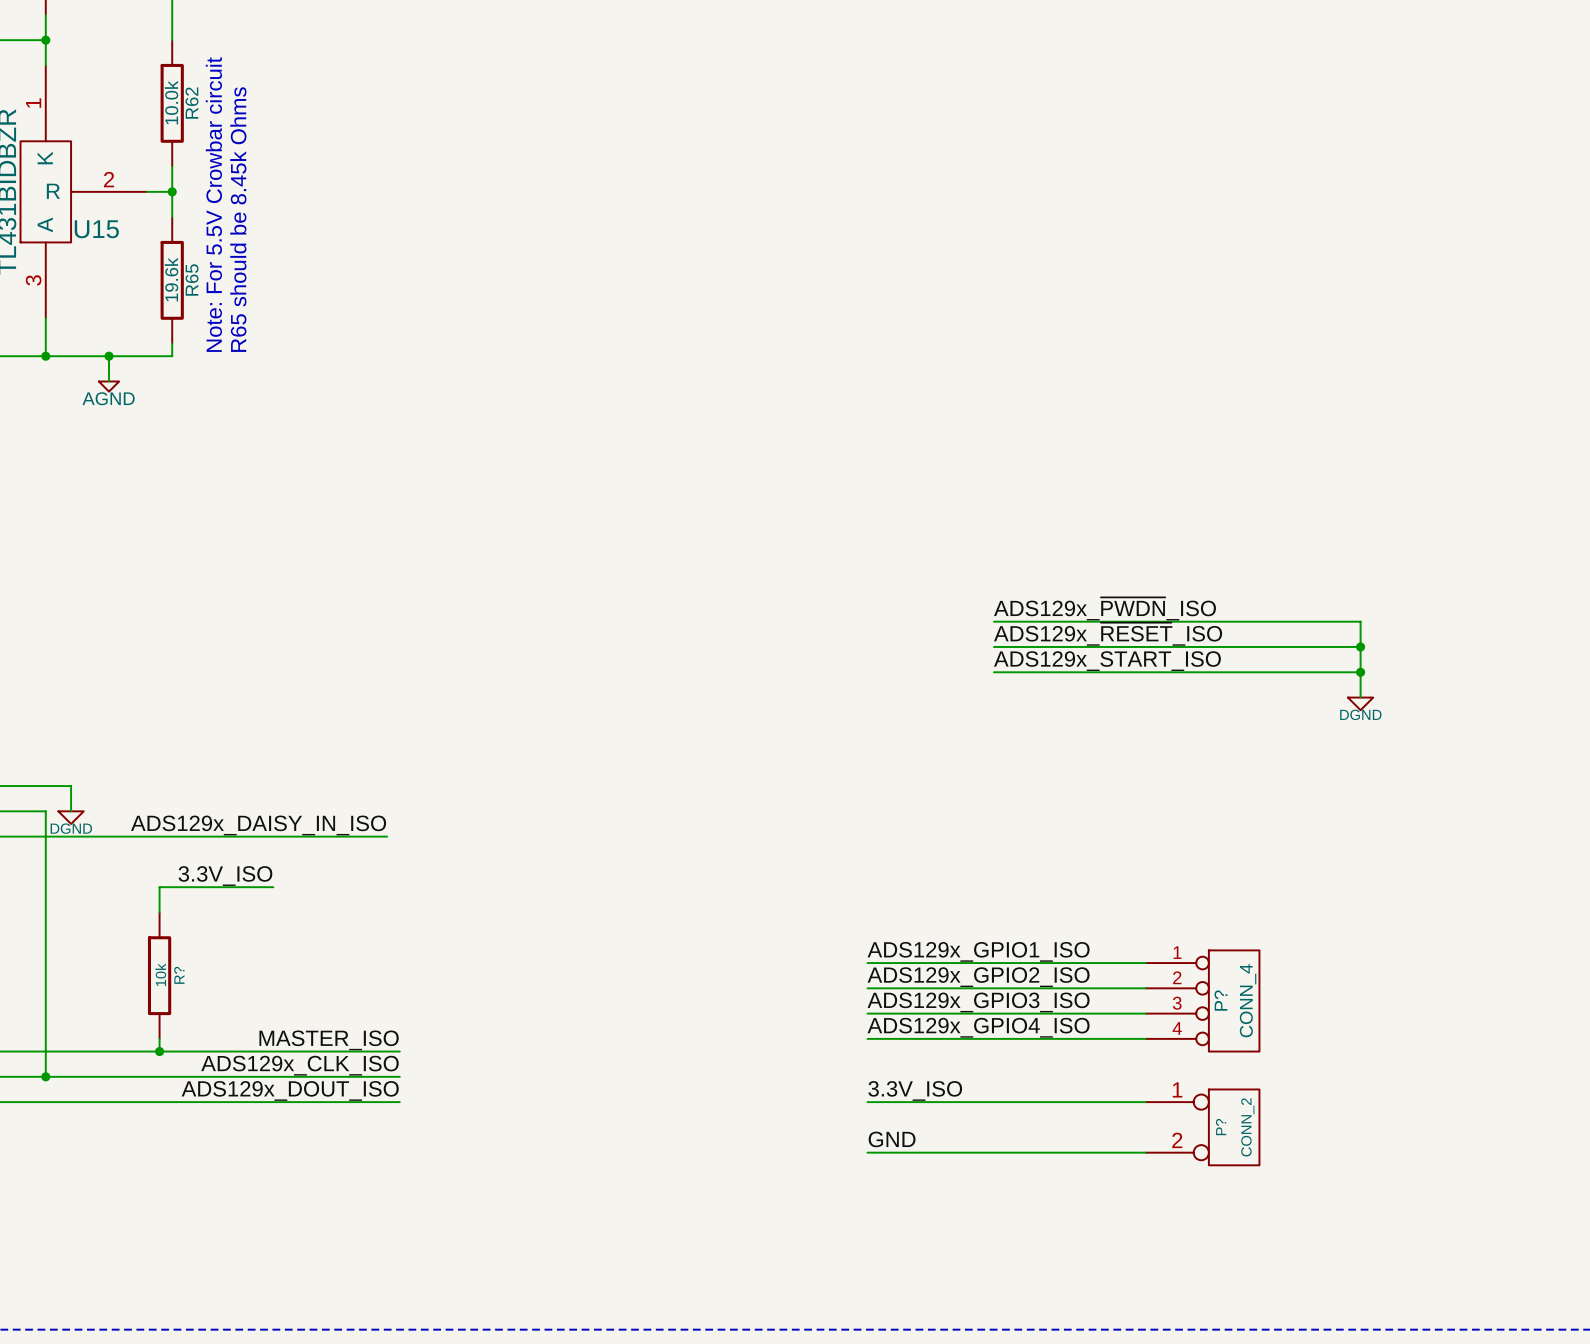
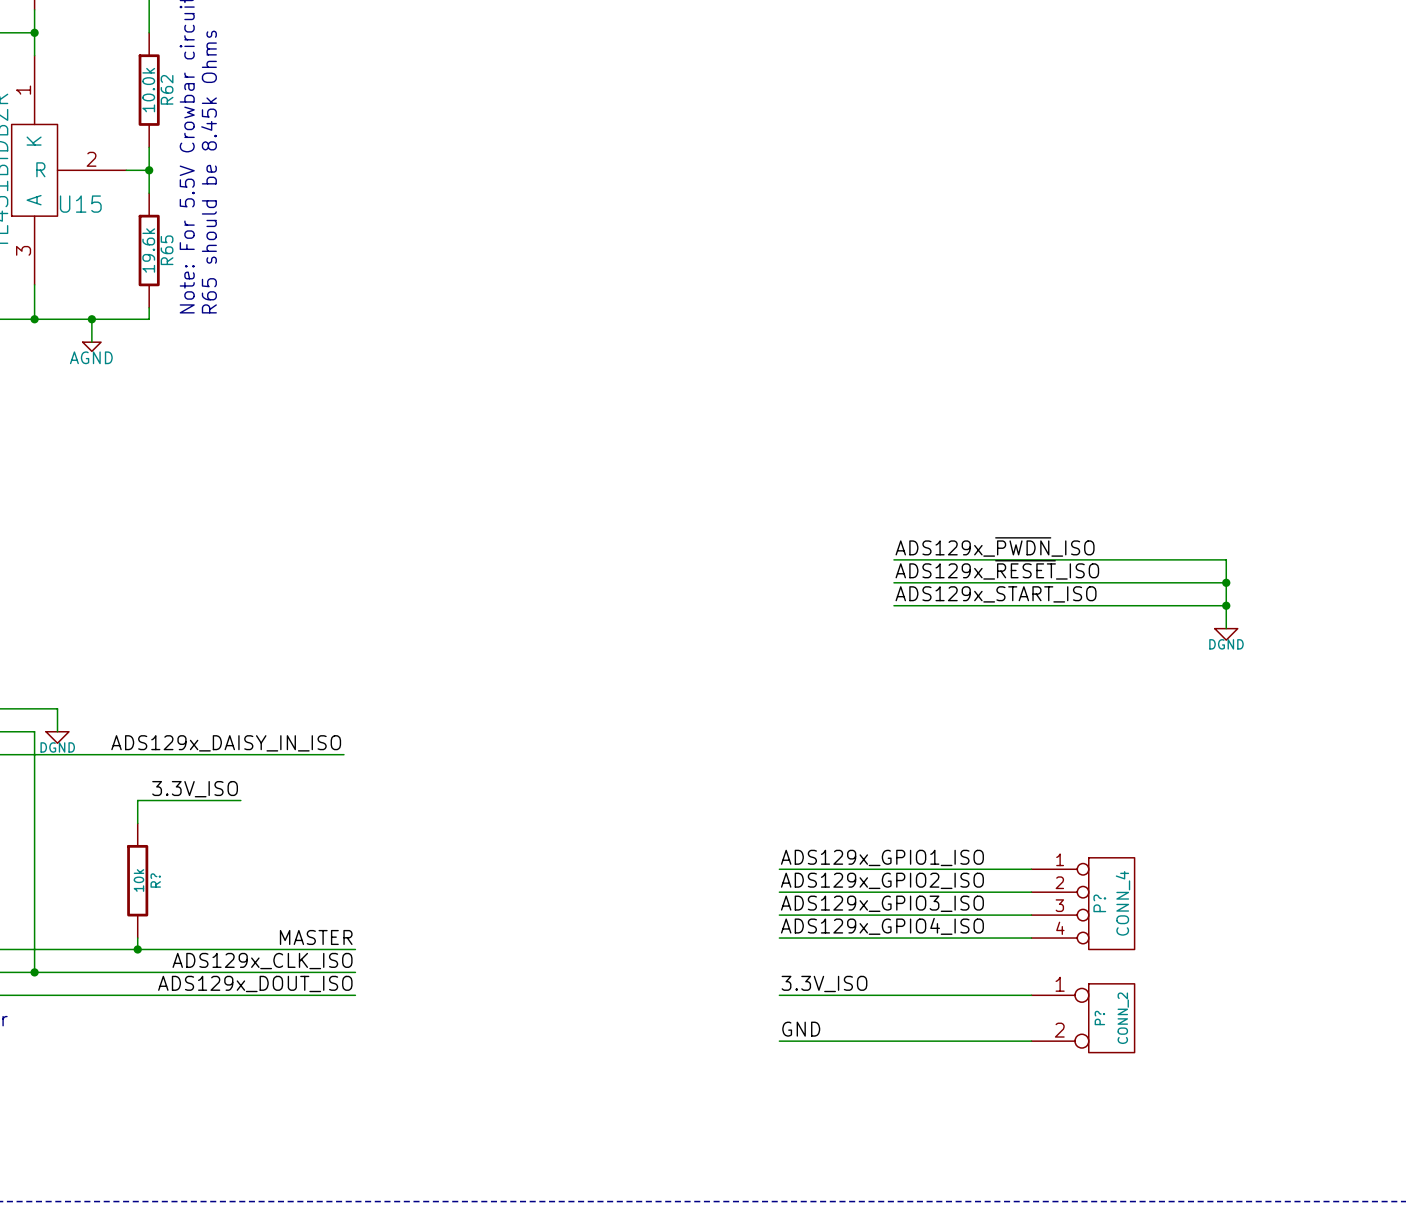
label: MASTER_ISO (329, 1040) -> MASTER (316, 937)

